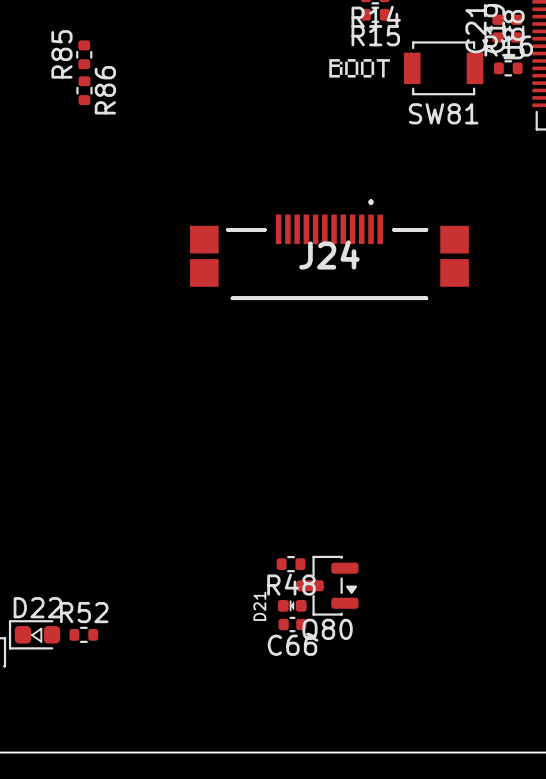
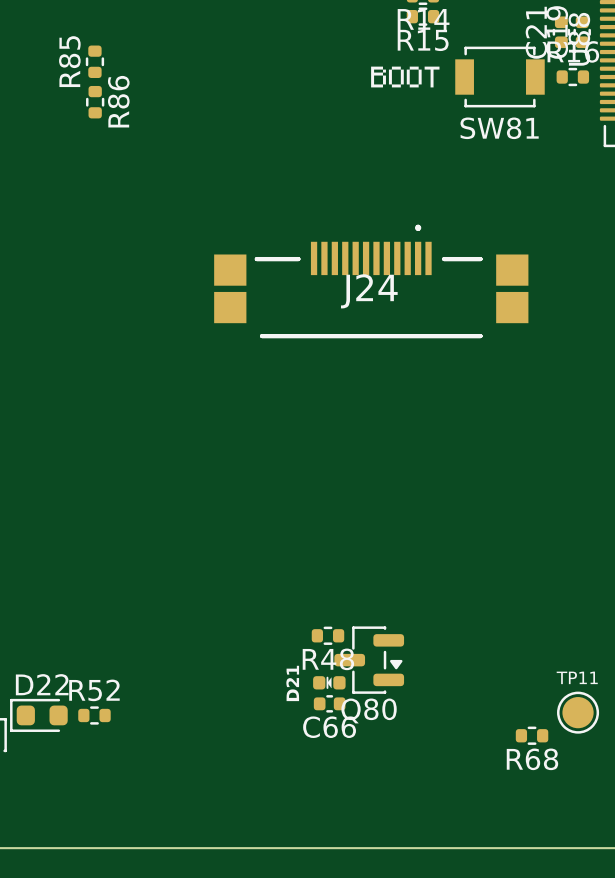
D22 footprint: [8, 620, 61, 650] -> [10, 698, 68, 732]
TP11: none -> (578, 712)
R68: none -> (532, 735)

